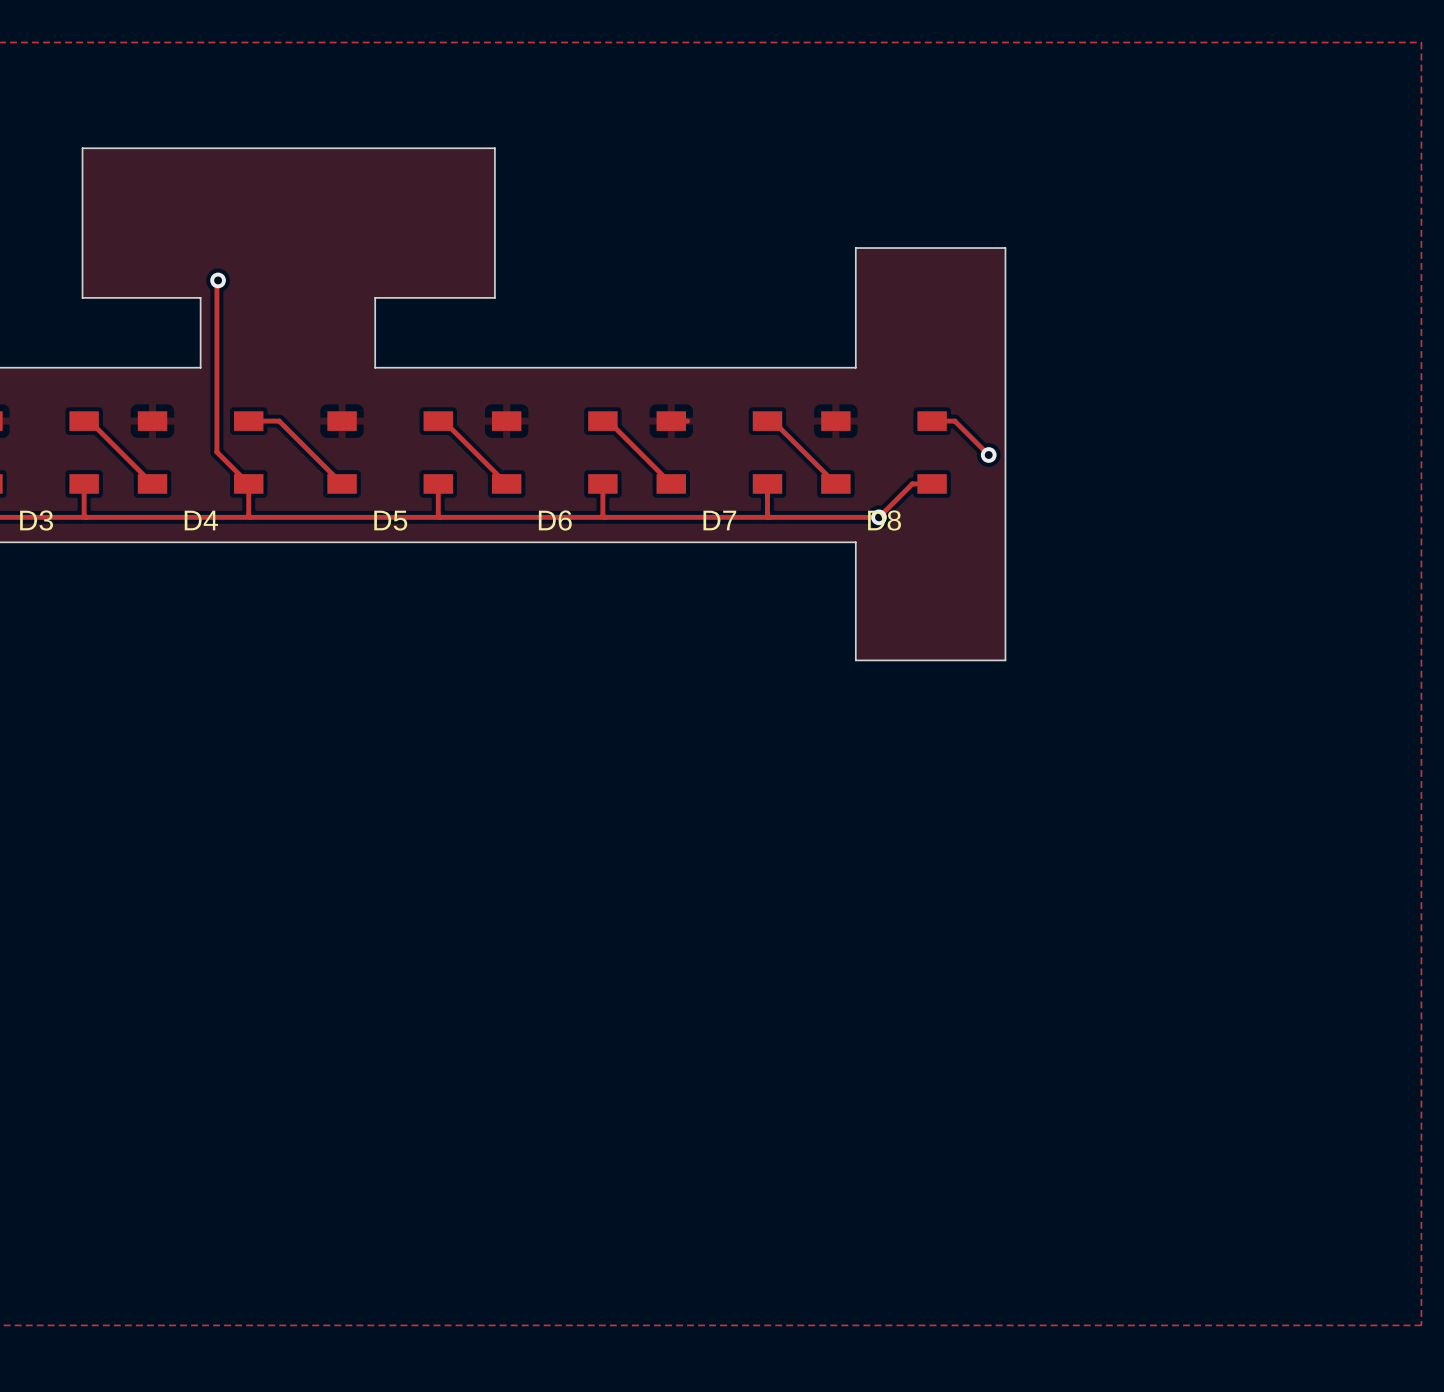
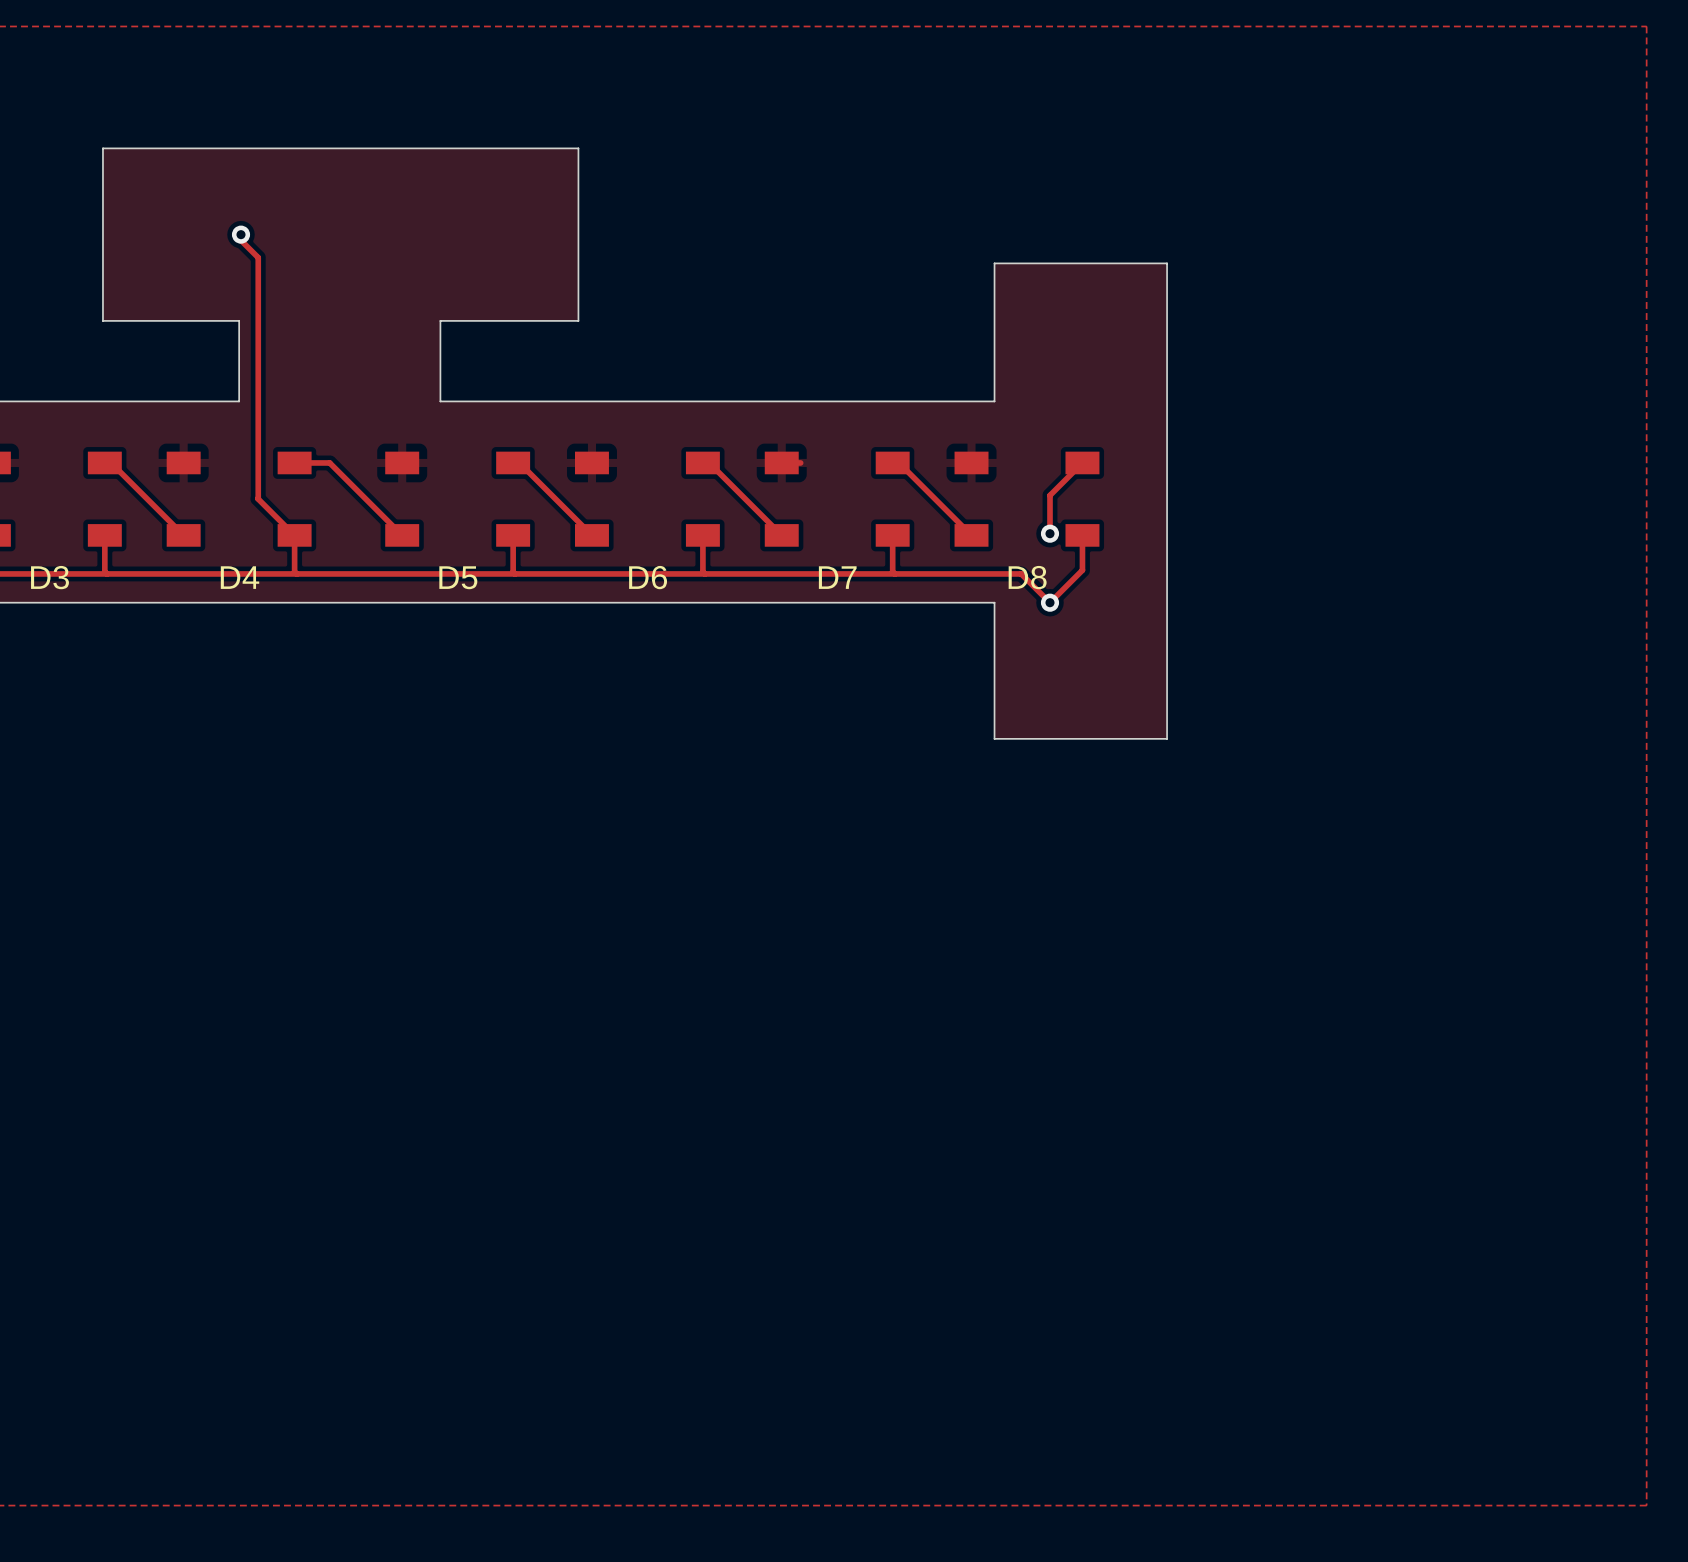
track: (218, 280) (216, 452) -> (241, 234) (241, 240) (258, 257) (258, 498)
via position: (218, 280) -> (241, 234)
track: (932, 421) (954, 421) (988, 455) -> (1082, 462) (1050, 495) (1050, 533)
via: (988, 455) -> none
via: none -> (1050, 533)
track: (932, 483) (912, 483) (878, 517) -> (1082, 535) (1082, 570) (1050, 602) (1021, 573)
via: (878, 517) -> none
via: none -> (1050, 602)

